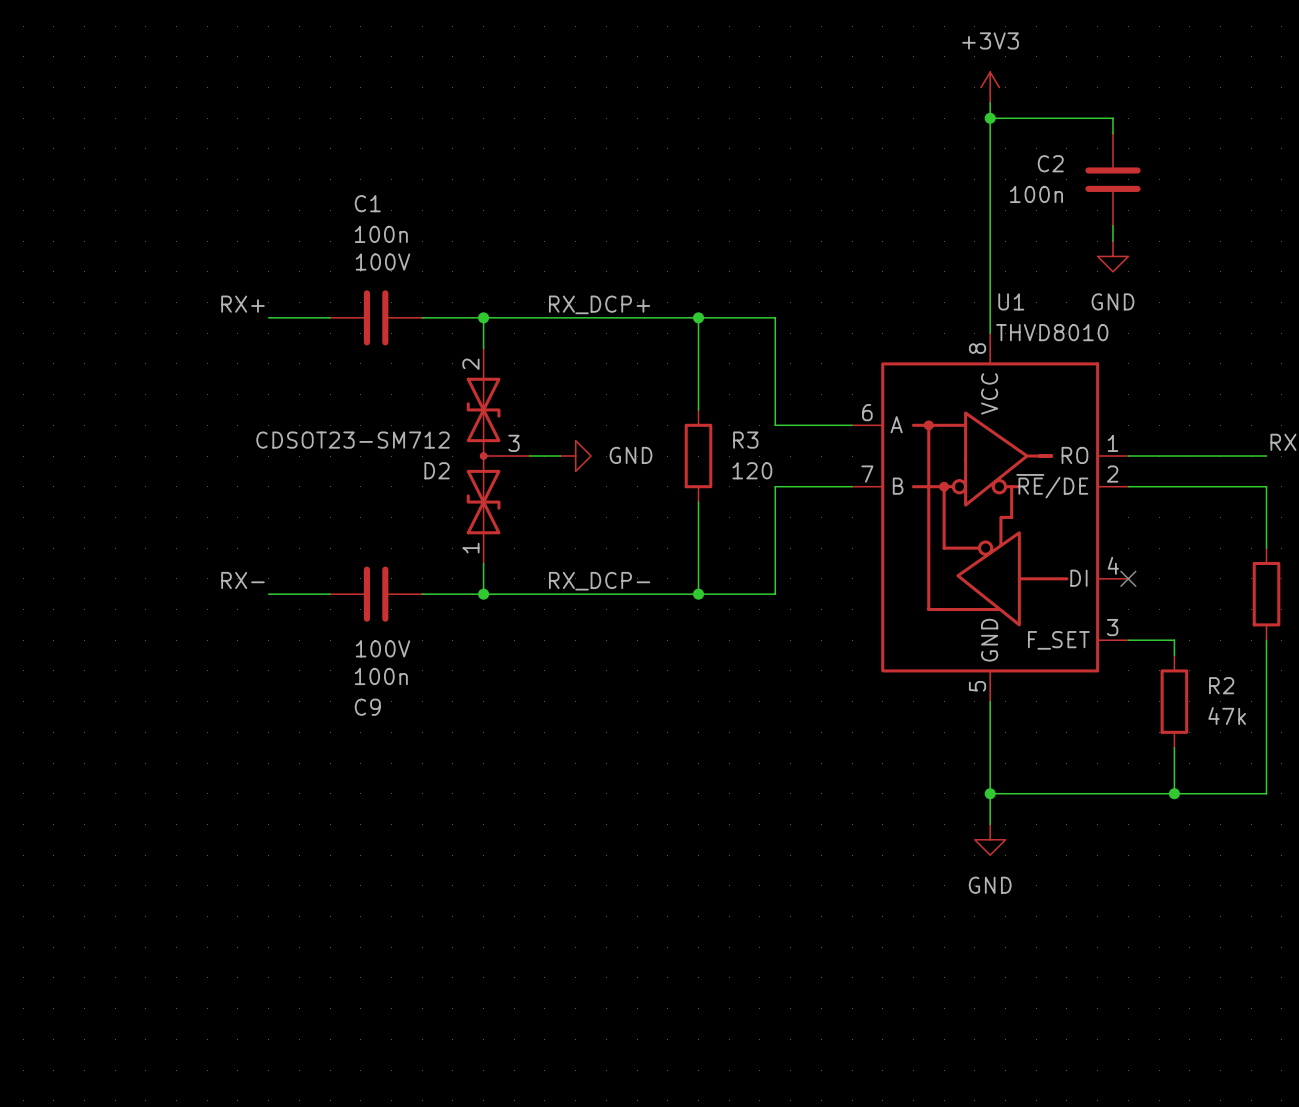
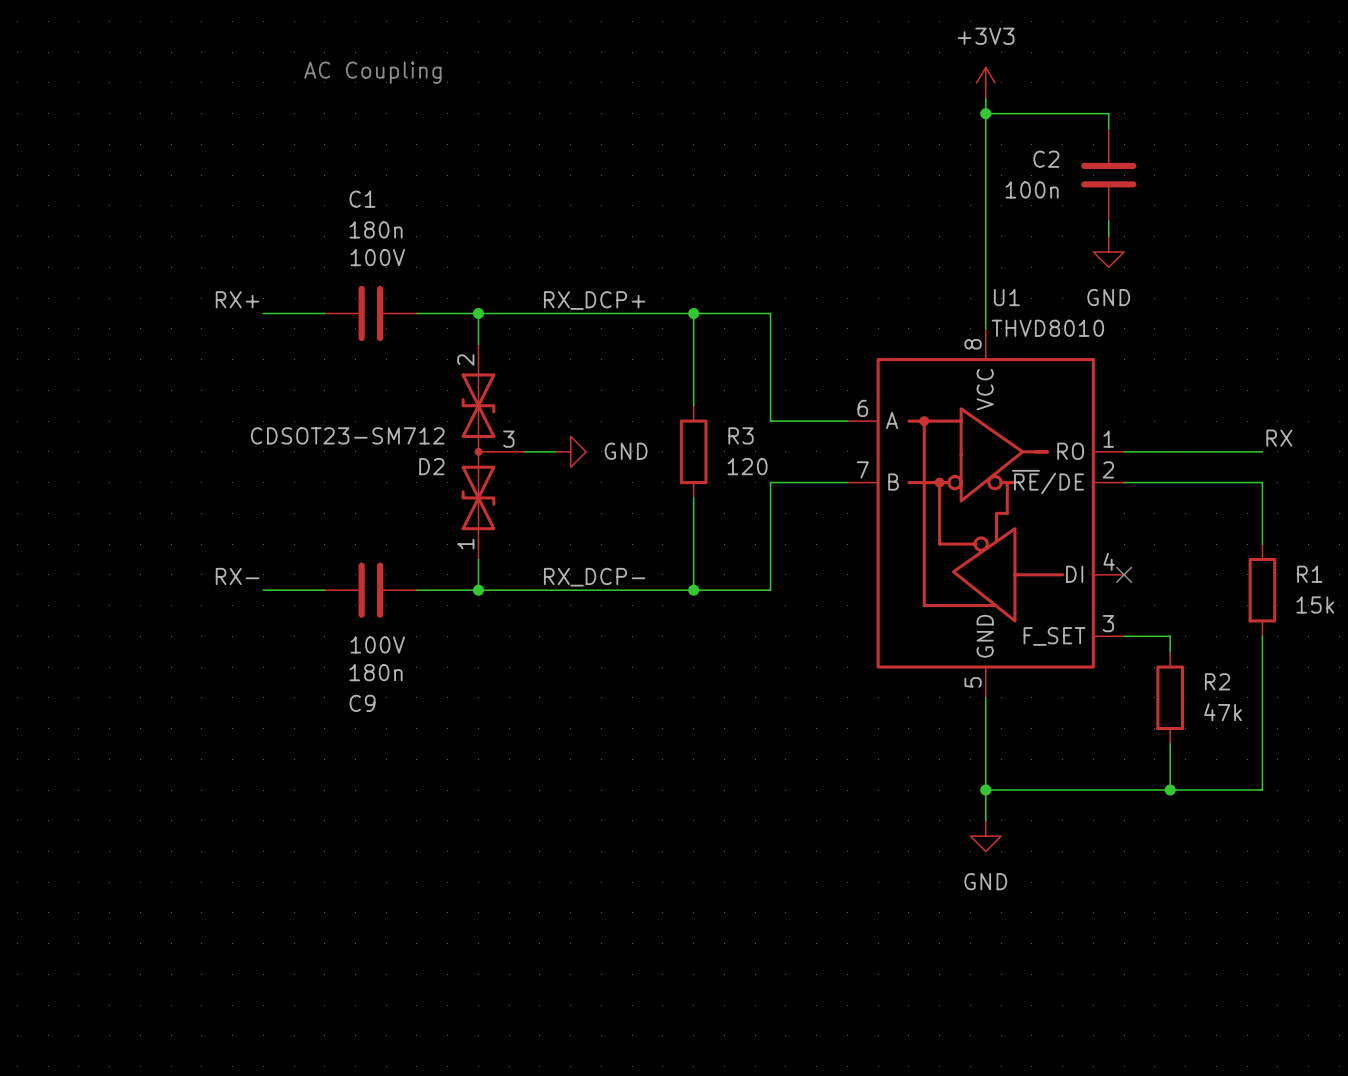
text: none -> AC Coupling (372, 72)
C1 value: 100n (381, 234) -> 180n (376, 229)
C9 value: 100n (381, 676) -> 180n (376, 672)

